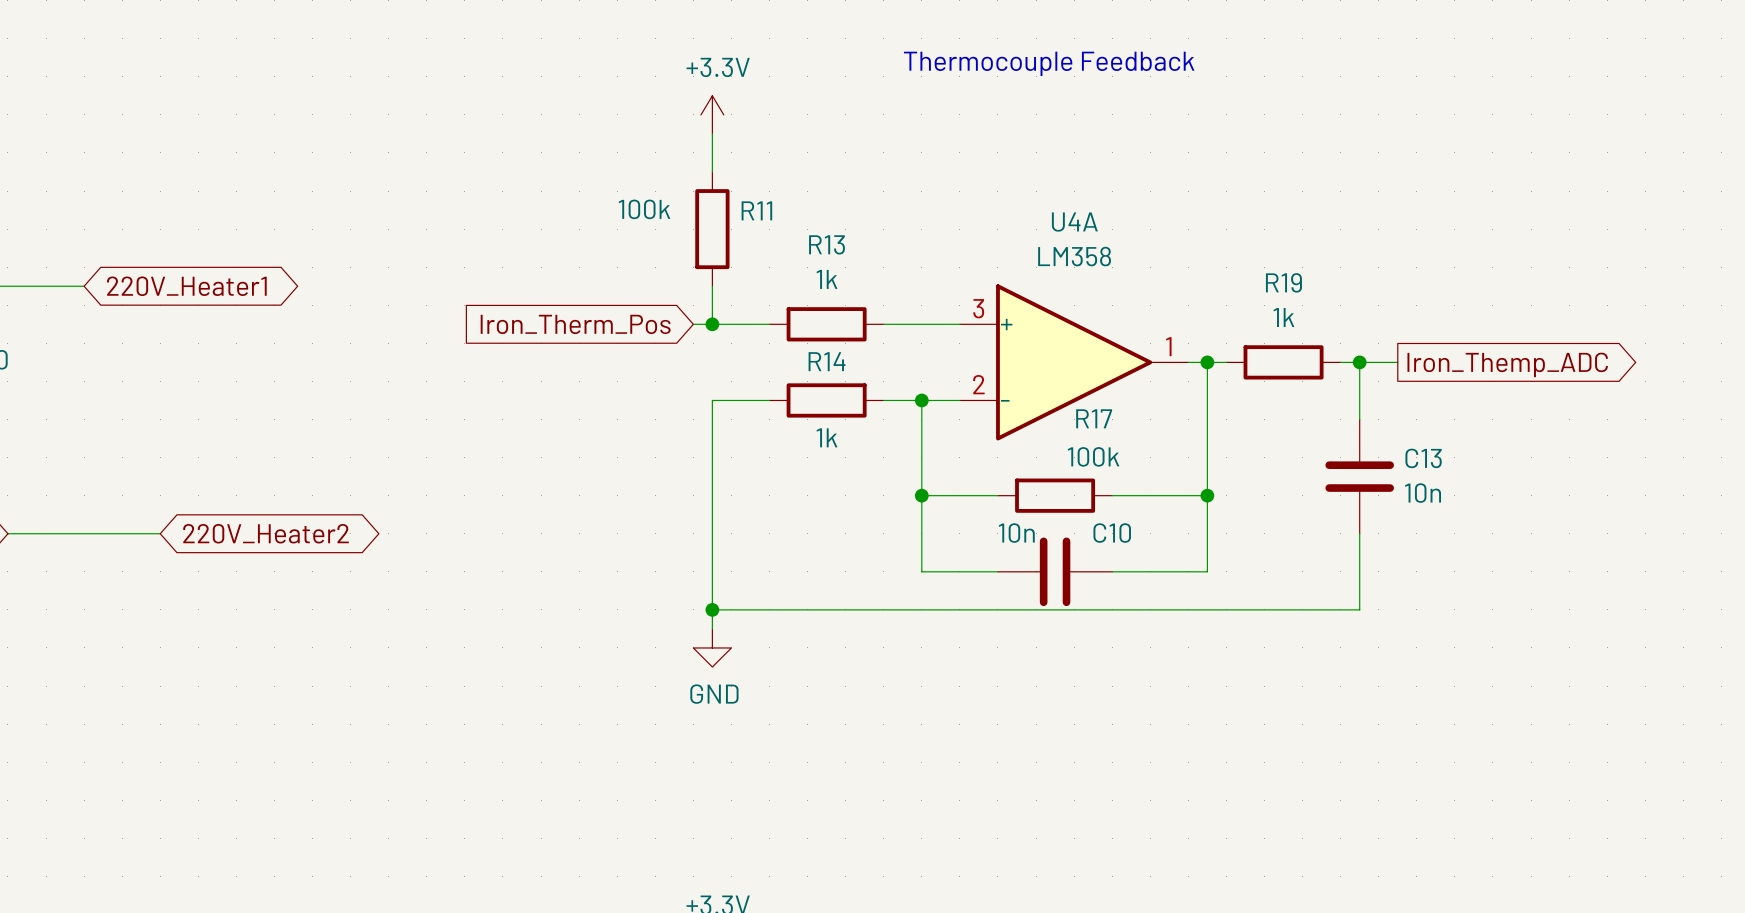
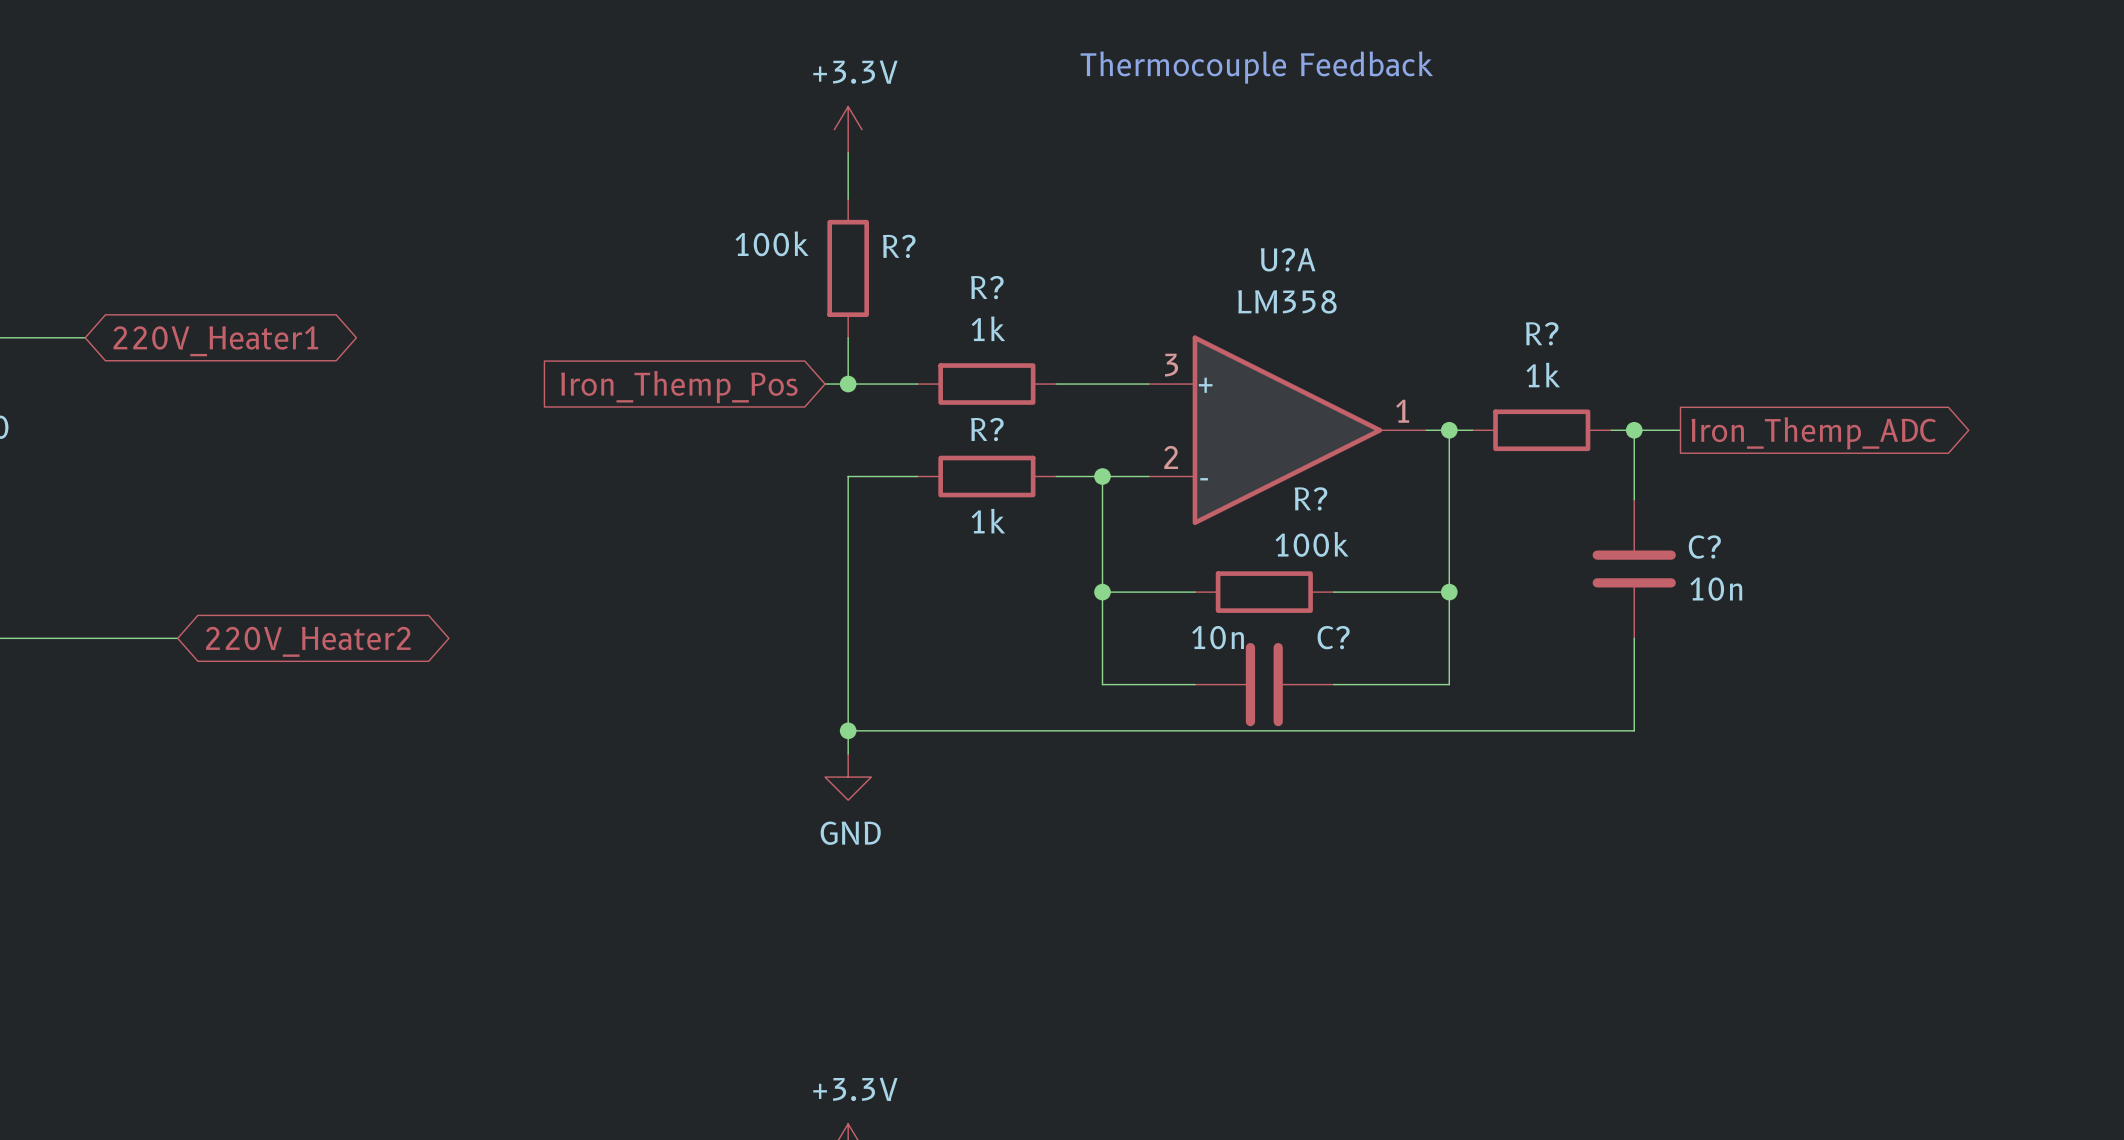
R11 name: R11 (756, 210) -> R? (899, 246)
U4A name: U4A (1074, 222) -> U?A (1288, 259)
R13 name: R13 (827, 244) -> R? (987, 287)
R19 name: R19 (1283, 282) -> R? (1542, 333)
global label: Iron_Therm_Pos (575, 324) -> Iron_Themp_Pos (679, 387)
R14 name: R14 (827, 361) -> R? (987, 429)
R17 name: R17 (1094, 418) -> R? (1310, 498)
C13 name: C13 (1423, 458) -> C? (1704, 547)
C10 name: C10 (1112, 533) -> C? (1333, 637)

